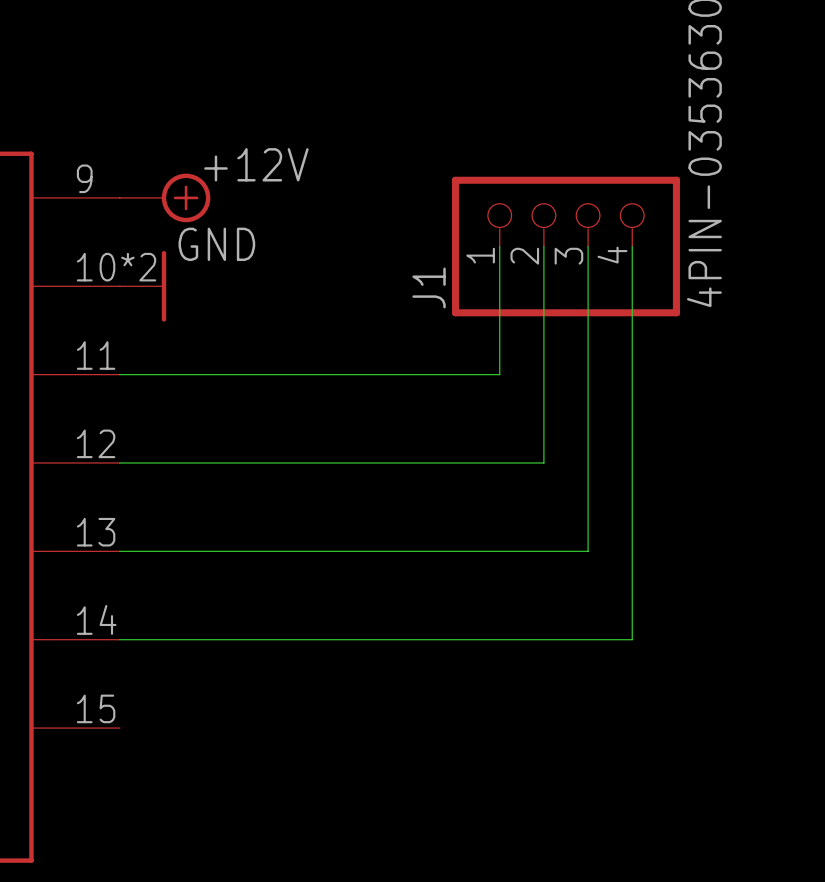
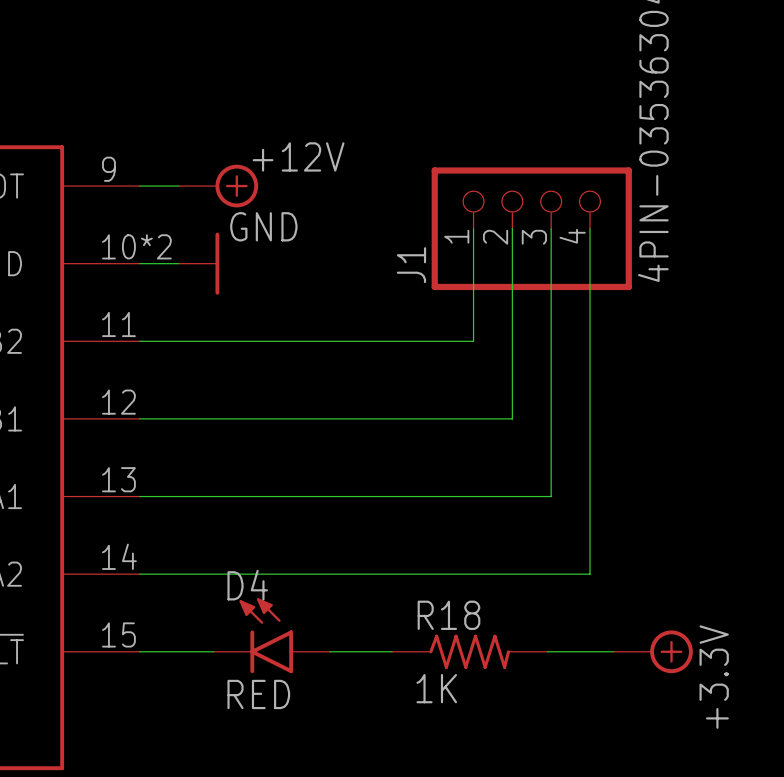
power symbol position: +12V (165, 197) -> +12V (218, 186)
power symbol position: GND (143, 286) -> GND (198, 263)
D4: none -> RED (271, 635)
wire: none -> (139, 651) (213, 651)
wire: none -> (329, 651) (392, 651)
R18: none -> 1K (469, 651)
wire: none -> (547, 651) (613, 651)
power symbol: none -> +3.3V (653, 651)

